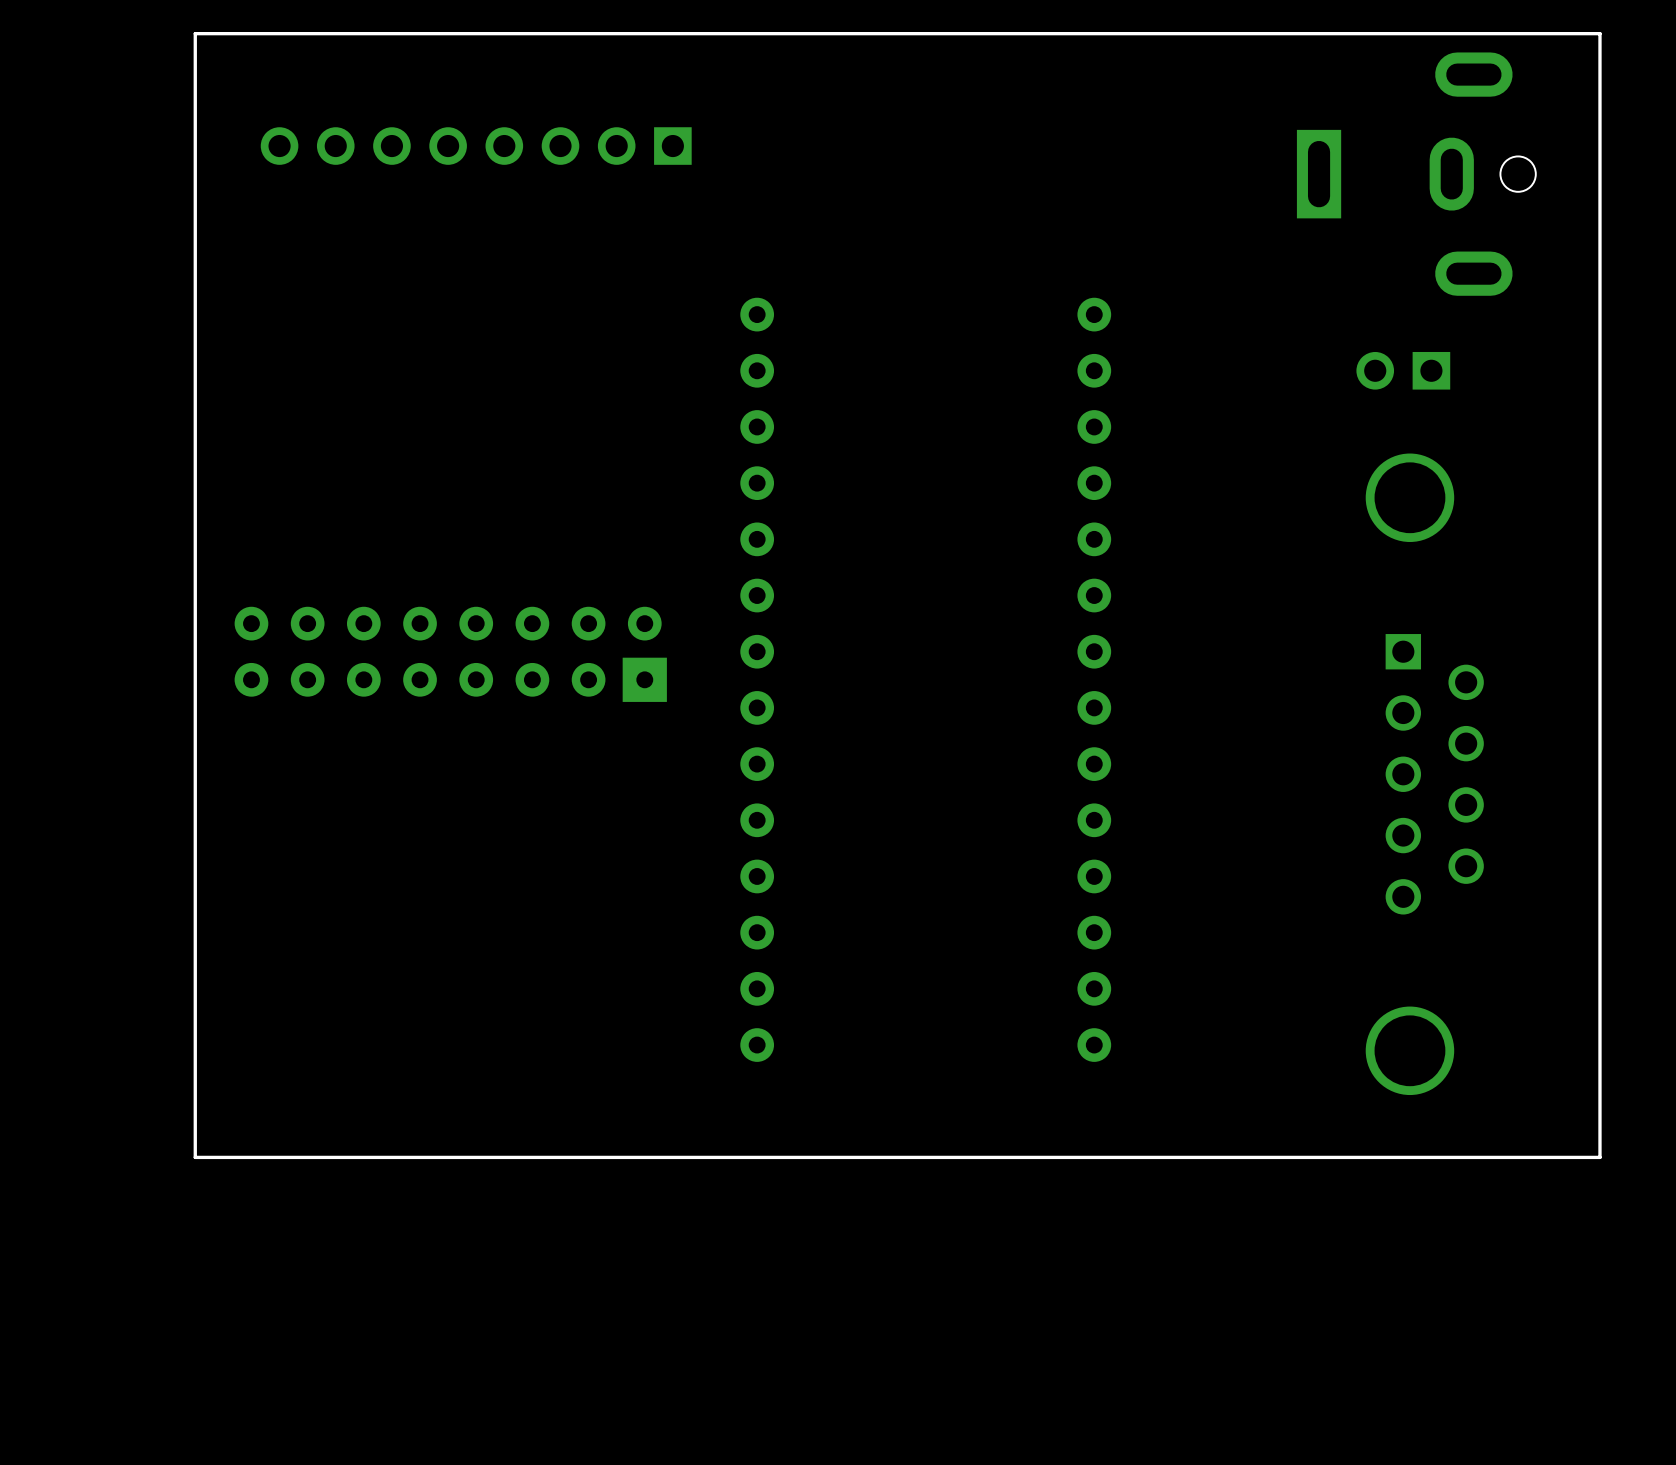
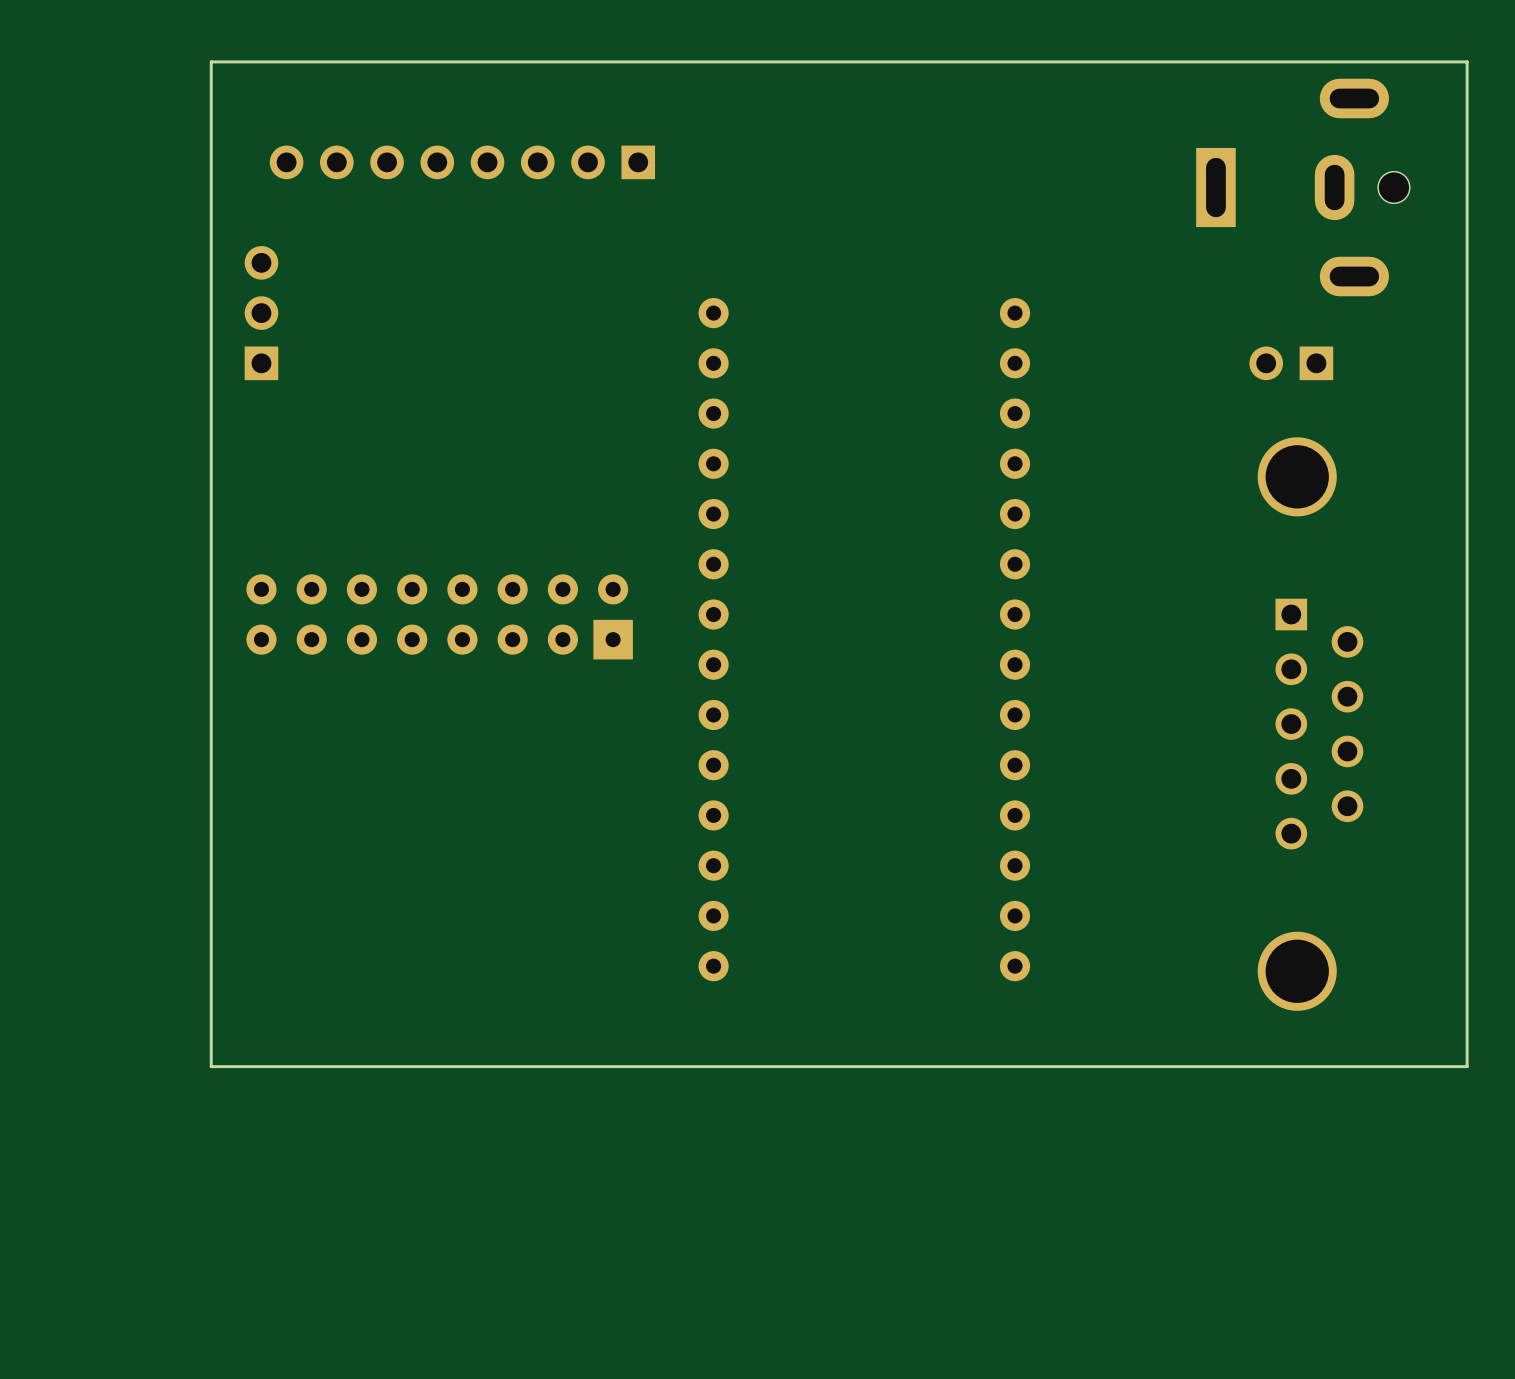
part: none -> (261, 313)

